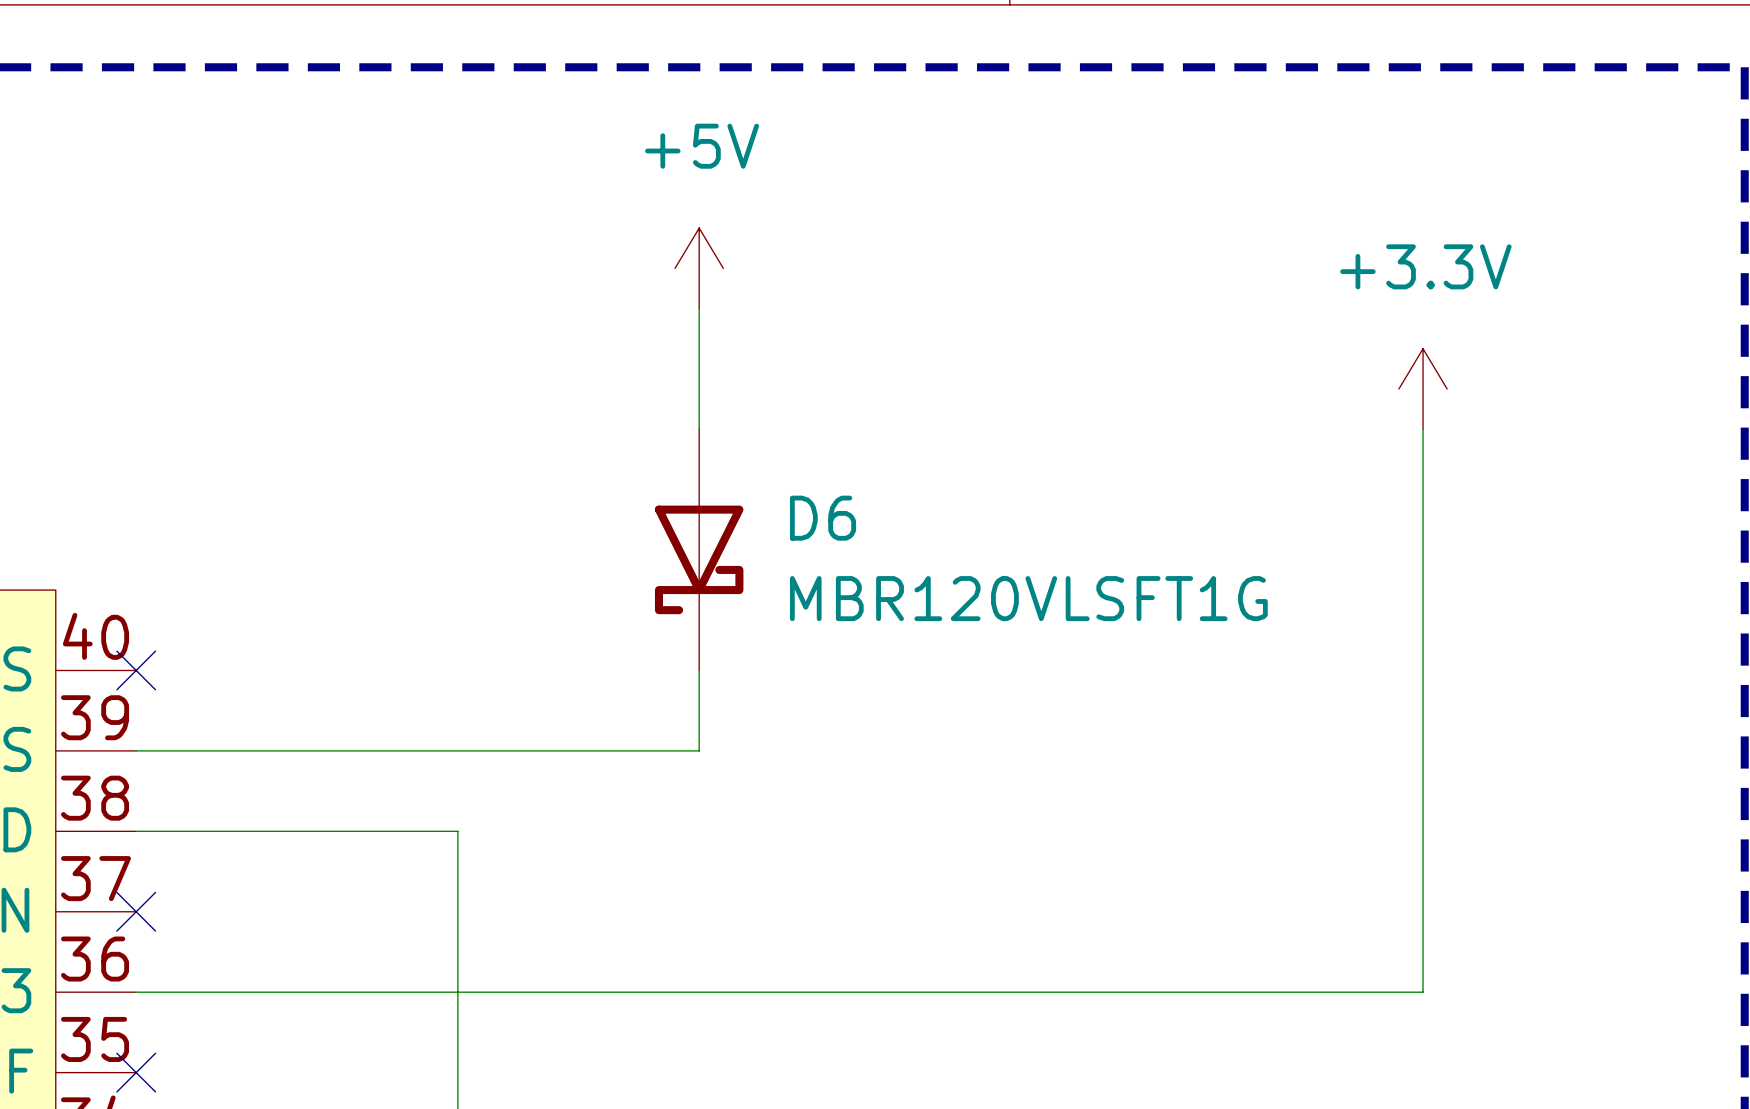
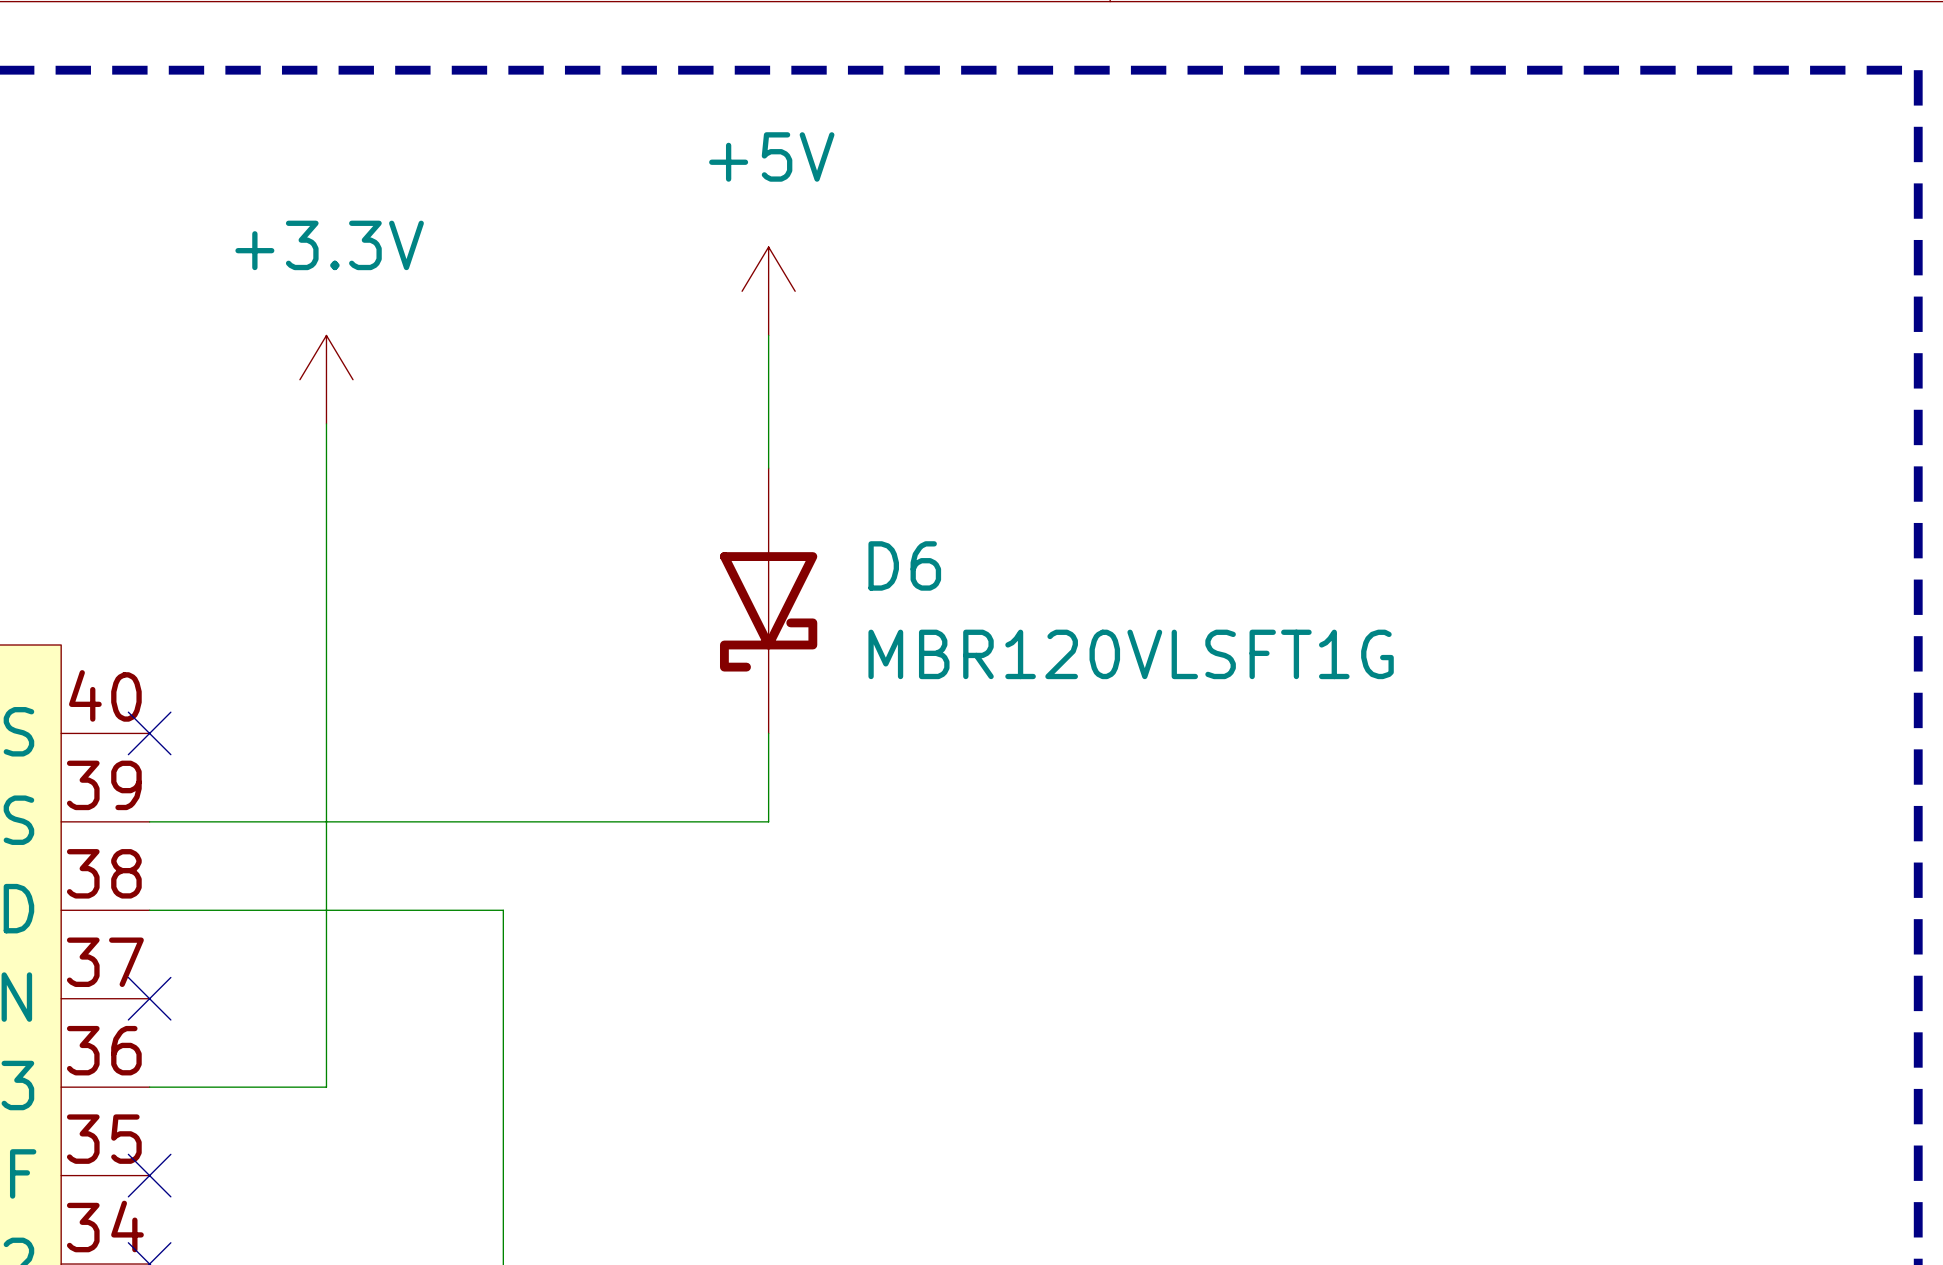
power symbol: none -> +3.3V (326, 379)
power symbol: +3.3V (1423, 388) -> none
wire: (1423, 429) (1423, 992) (297, 992) -> (326, 423) (326, 1087)

